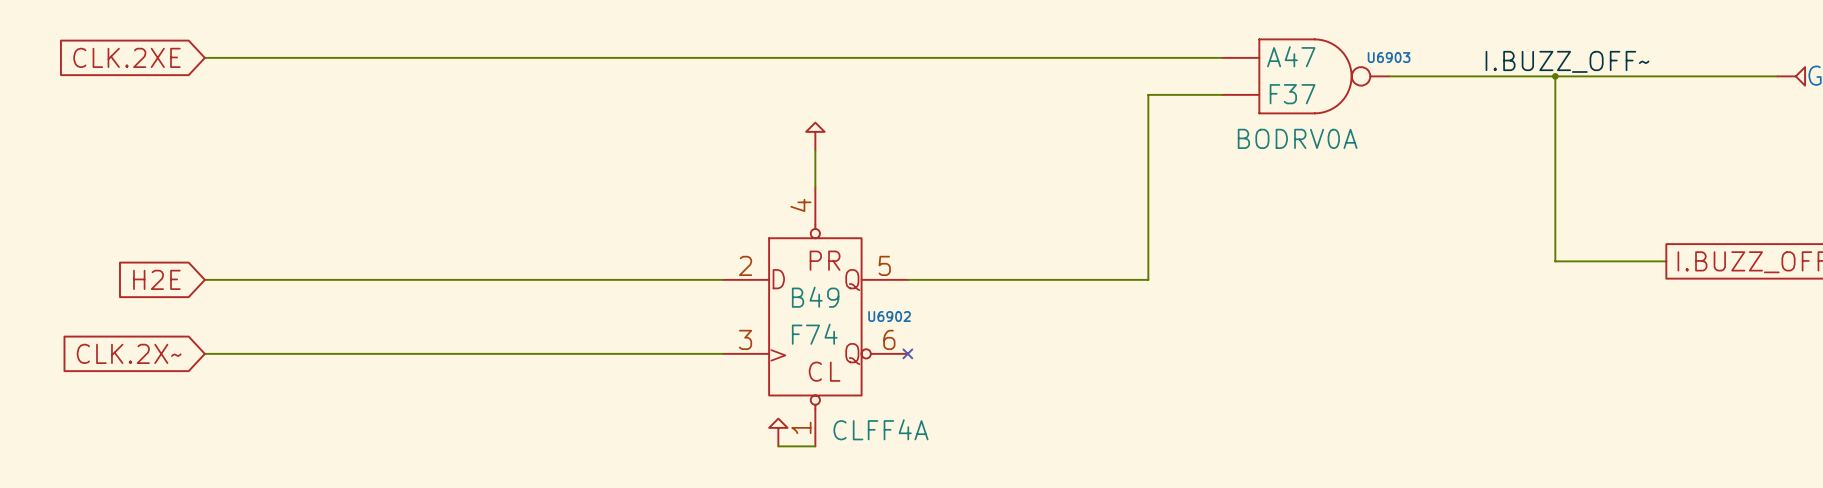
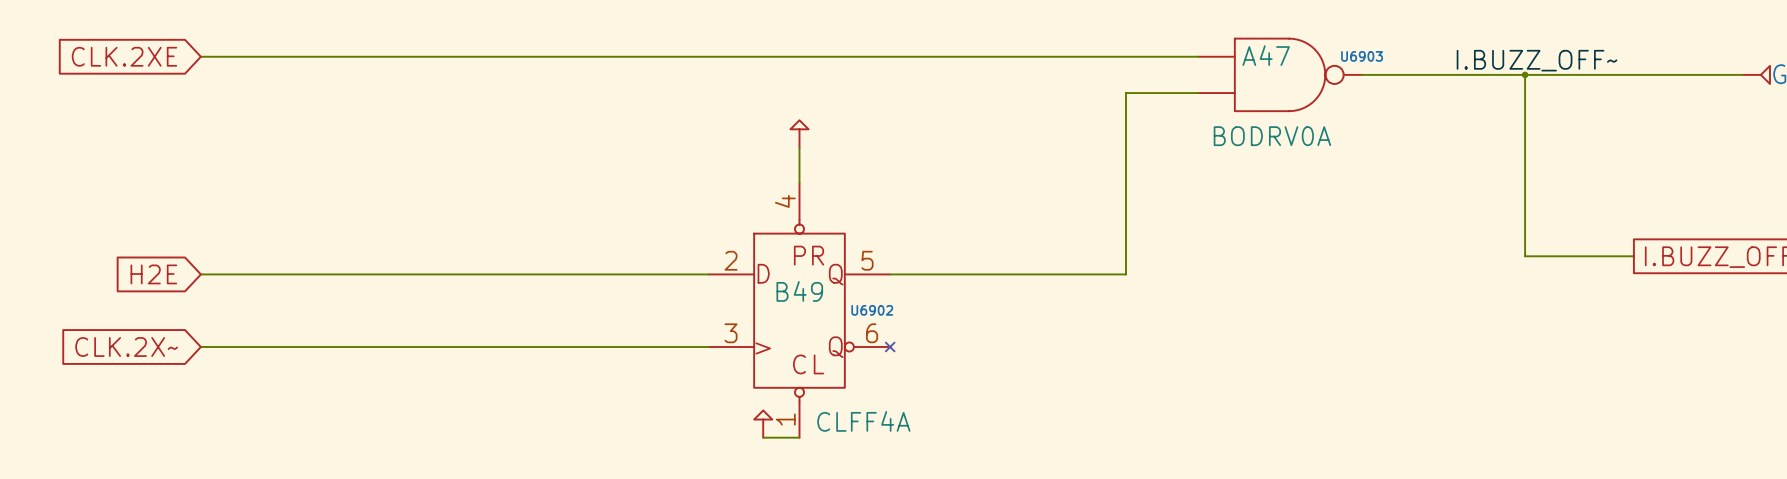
U6903 value: F37 (1292, 94) -> none
U6902 value: F74 (814, 334) -> none

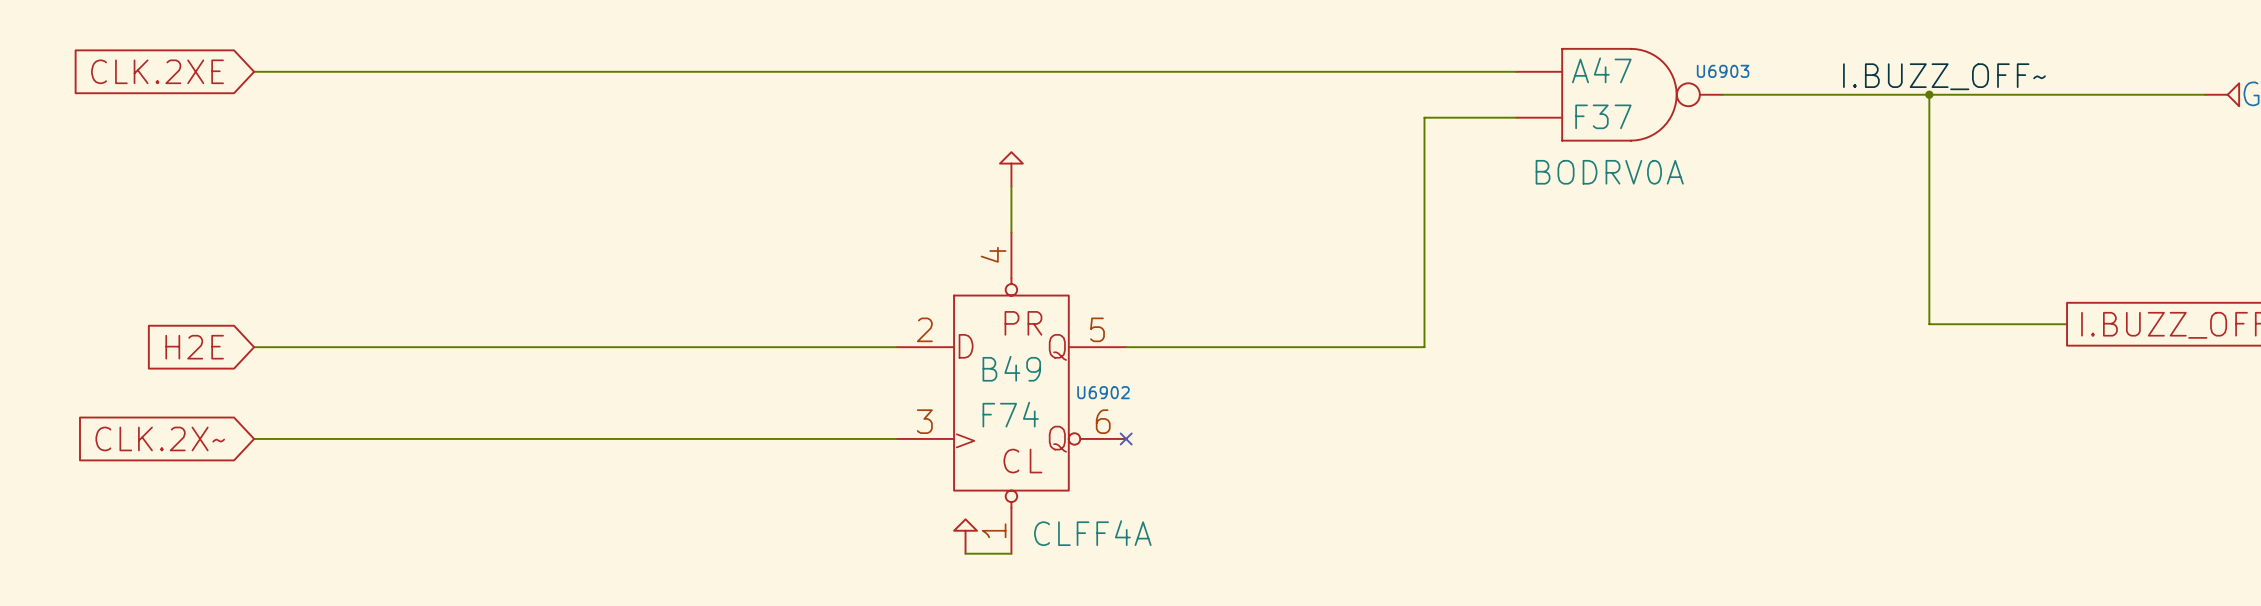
U6903 value: none -> F37 (1603, 116)
U6902 value: none -> F74 (1010, 414)

